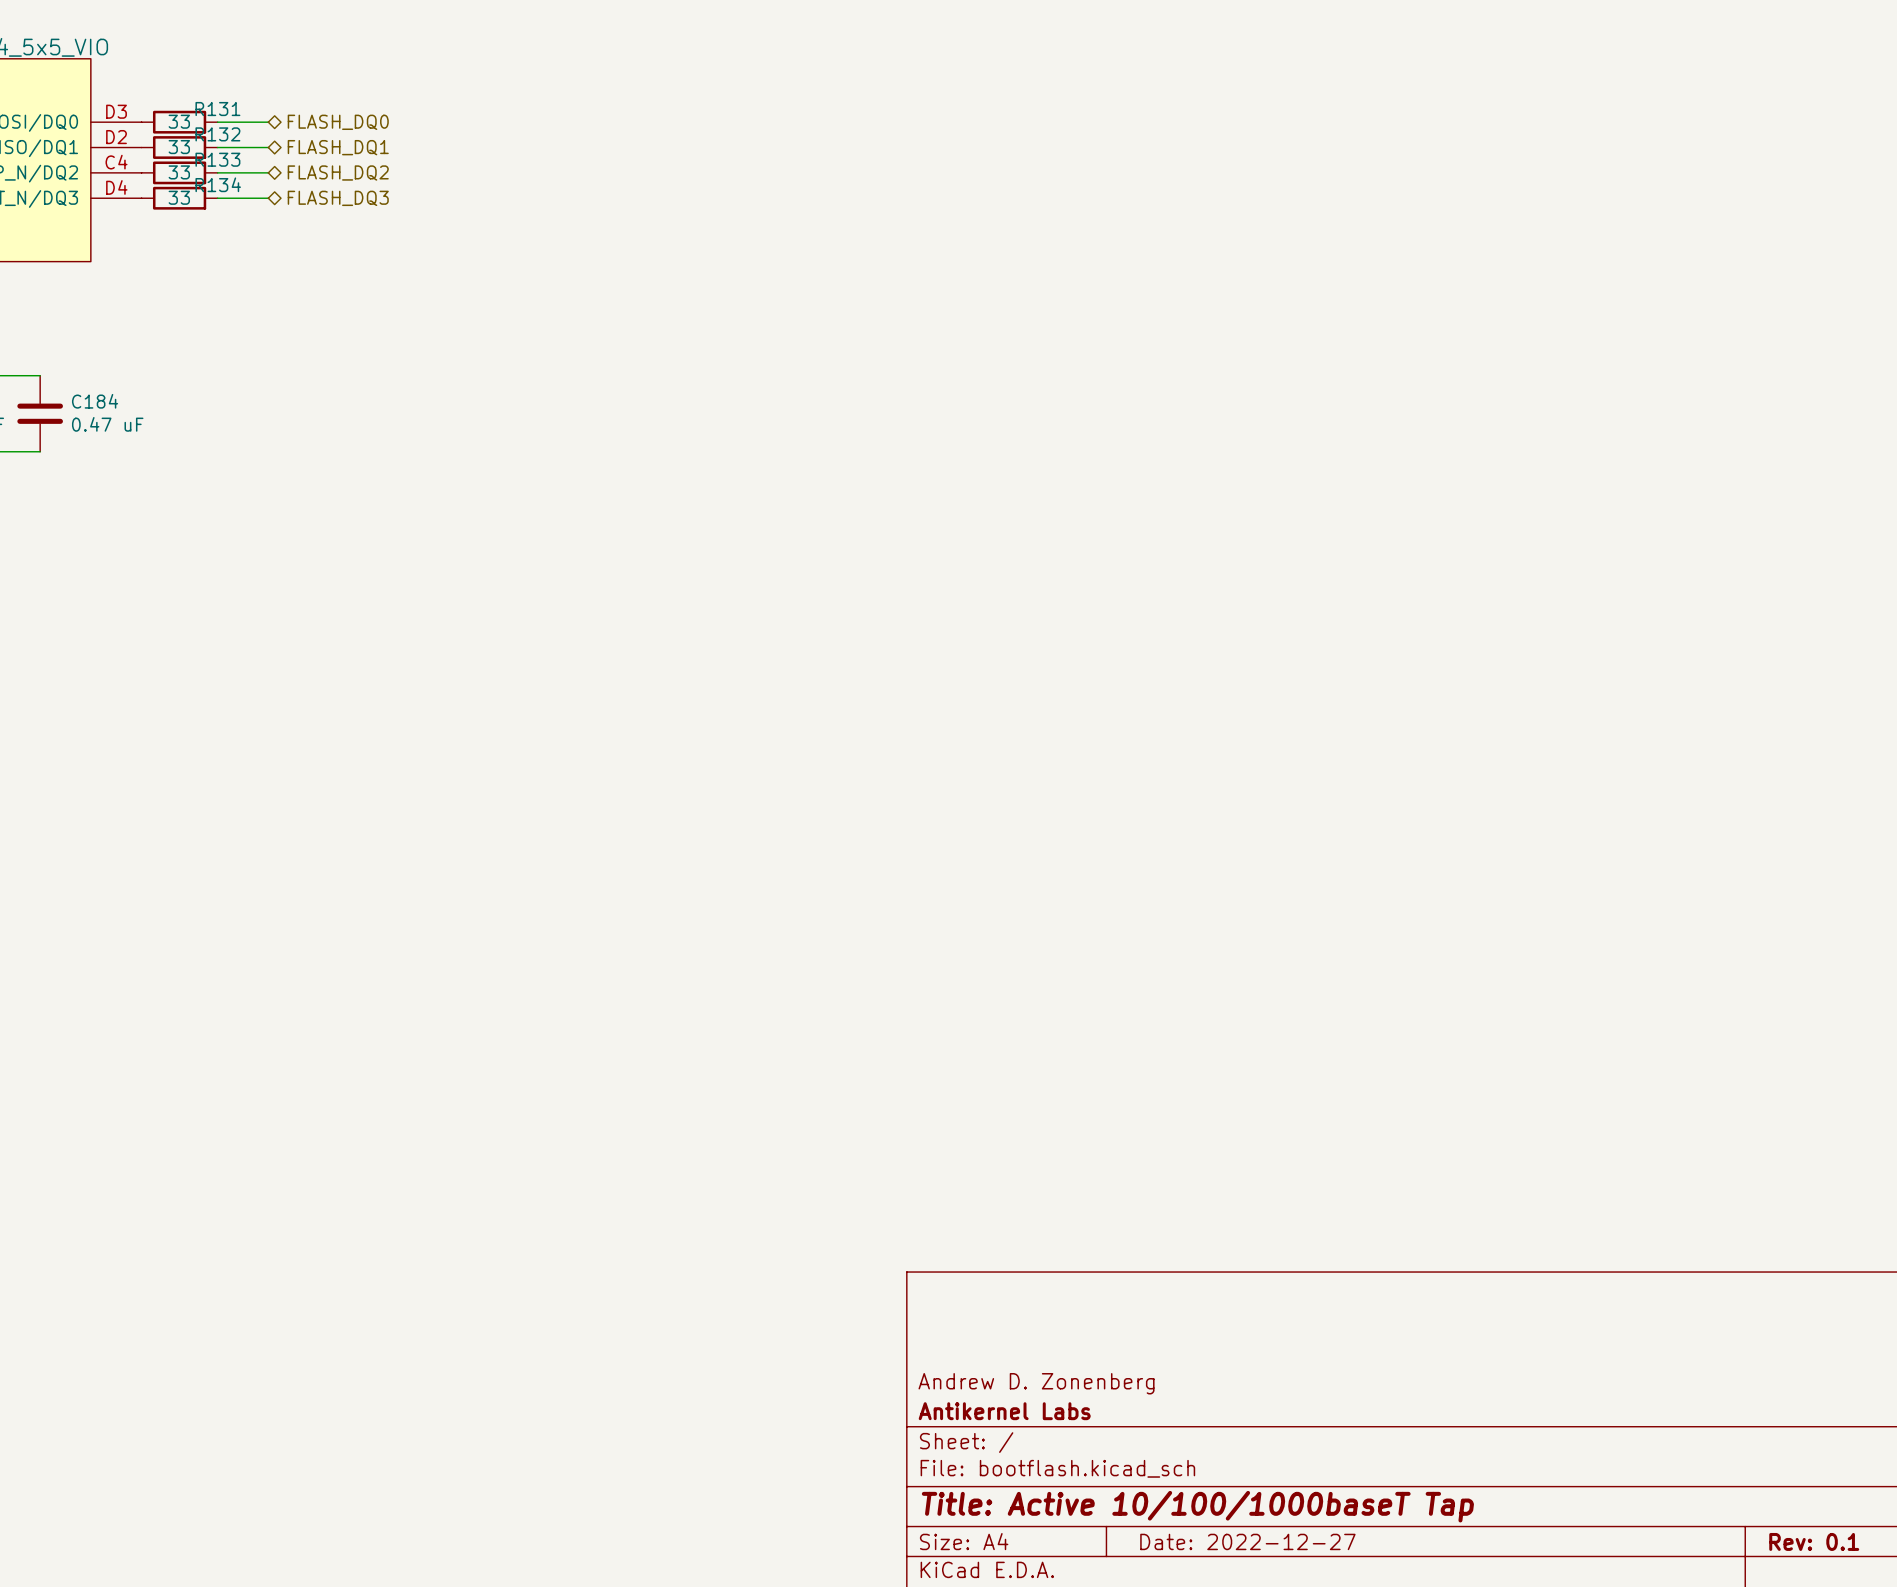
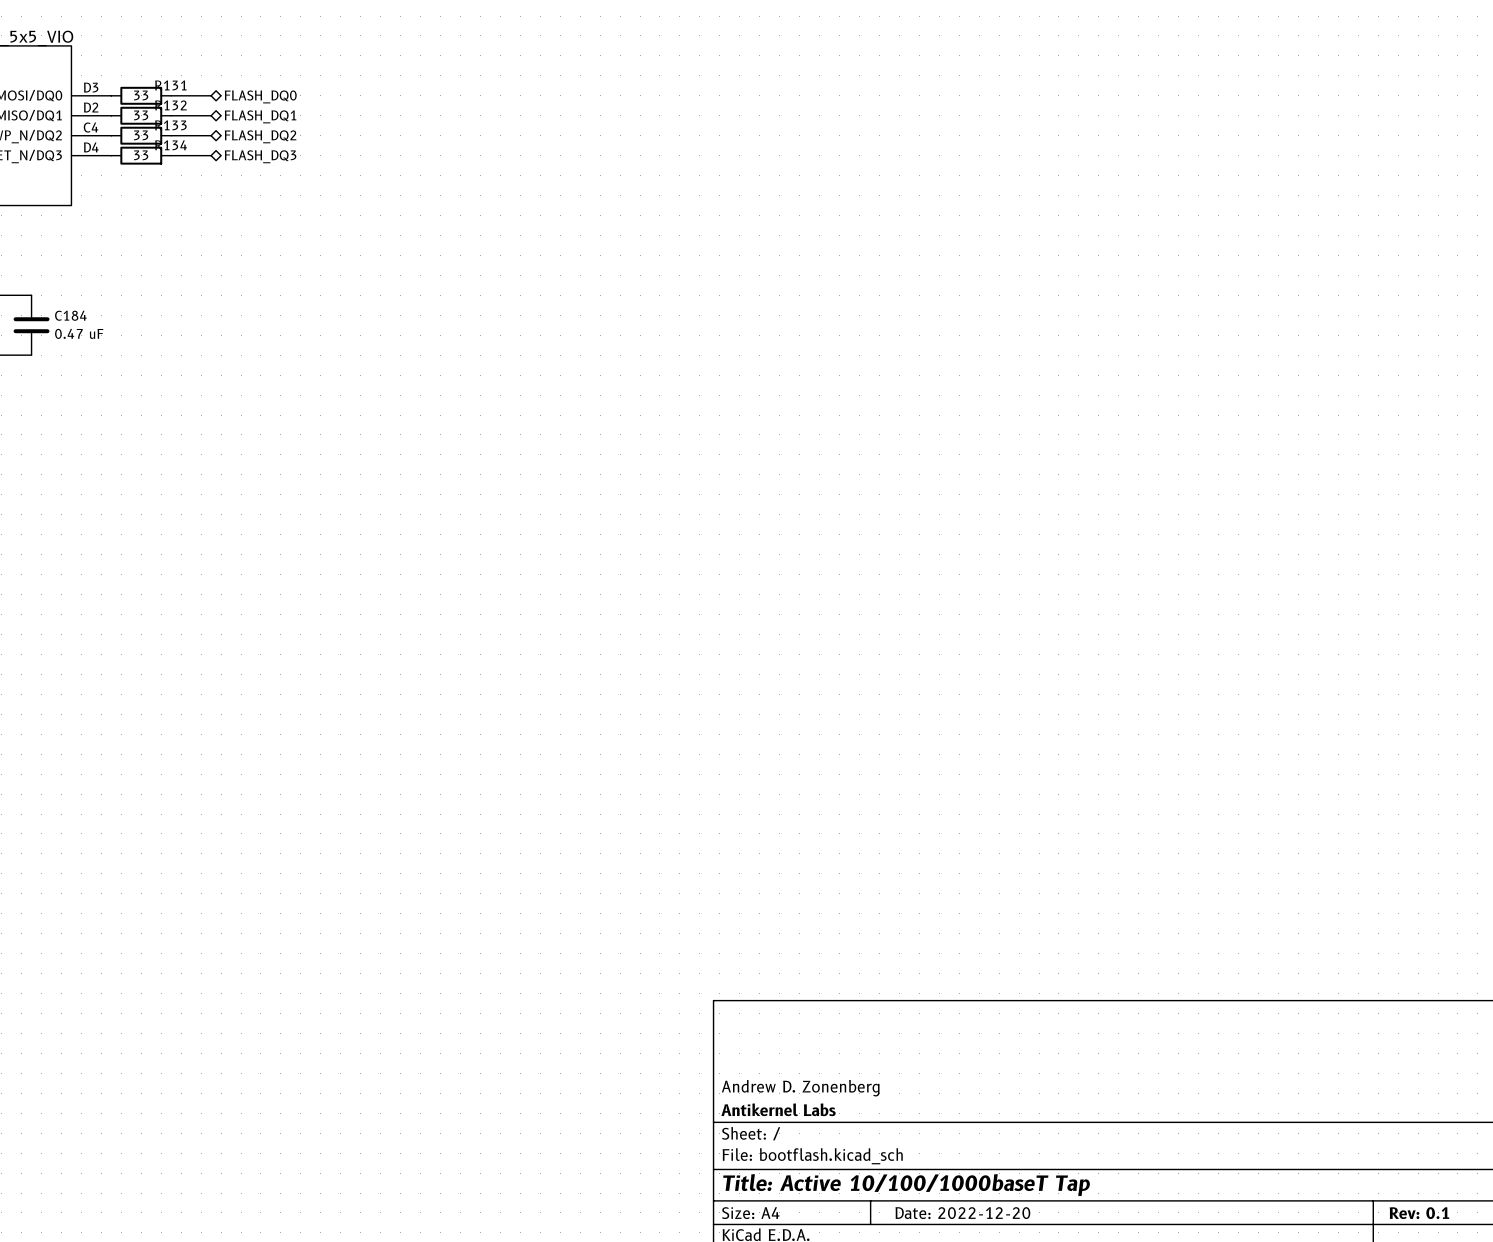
title block: Date: 2022-12-27 (1247, 1541) -> Date: 2022-12-20 (962, 1213)

